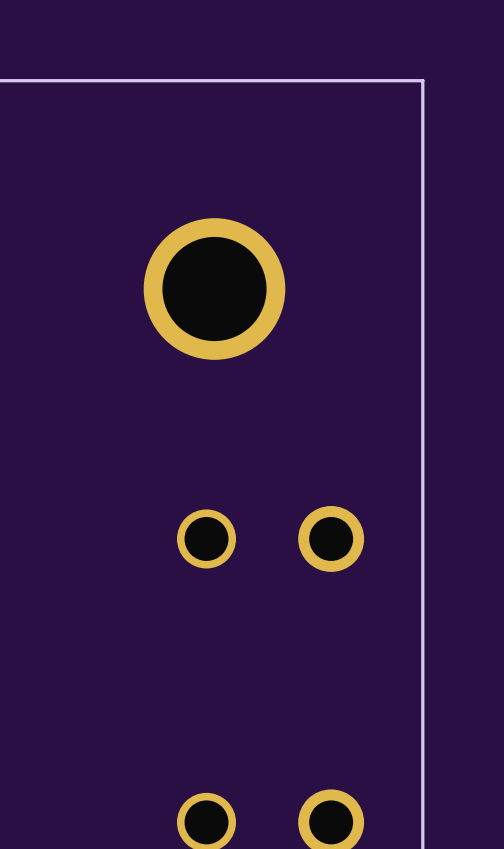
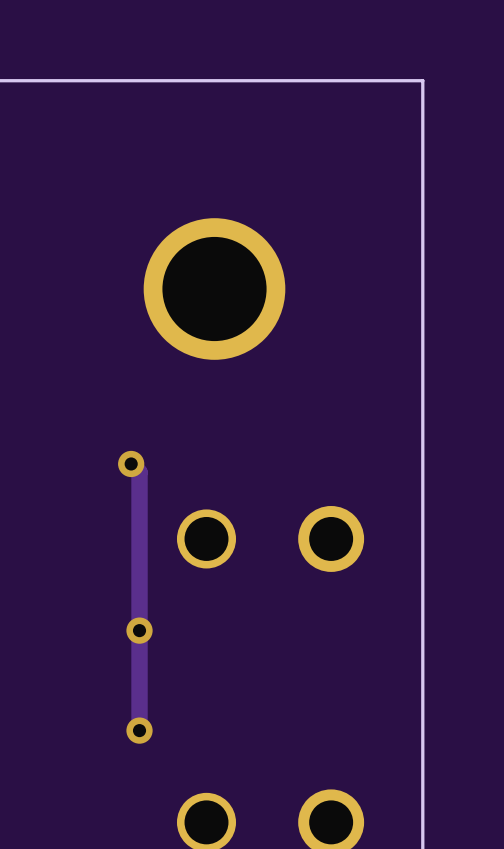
track: none -> (131, 463) (139, 472) (139, 730)
via: none -> (131, 463)
via: none -> (139, 630)
via: none -> (139, 730)

